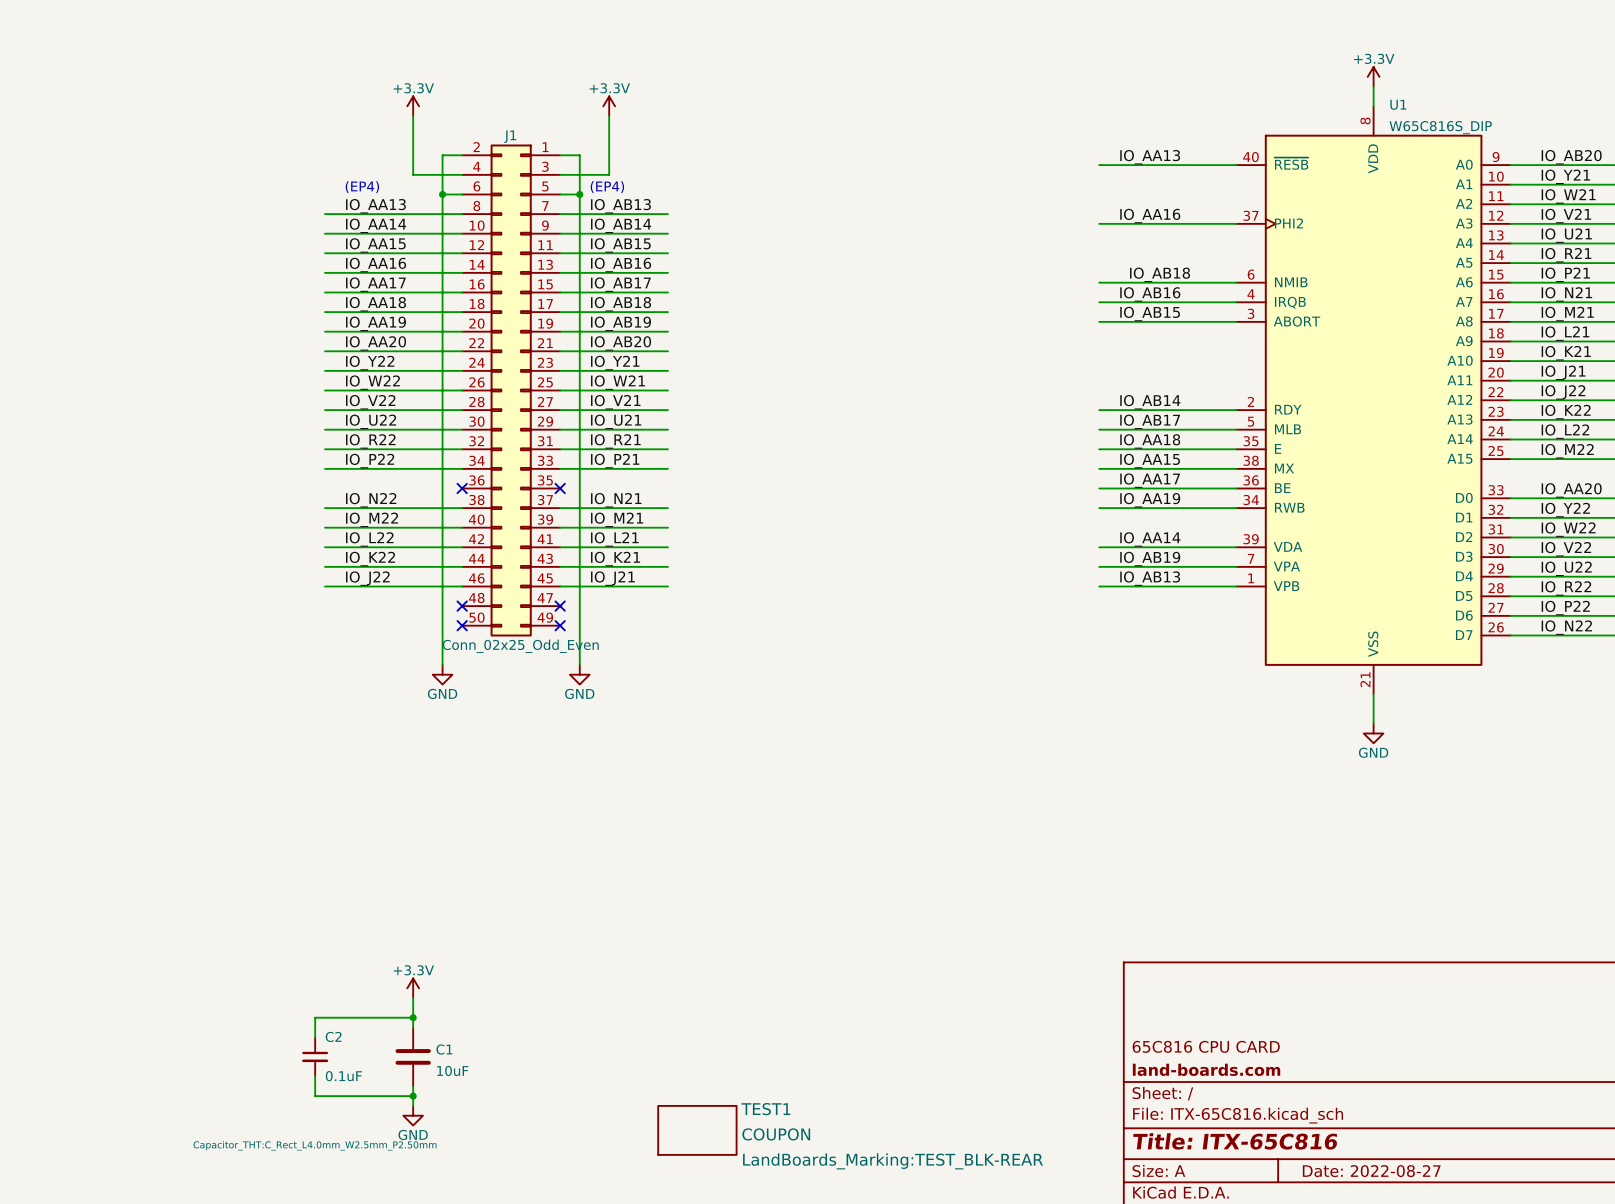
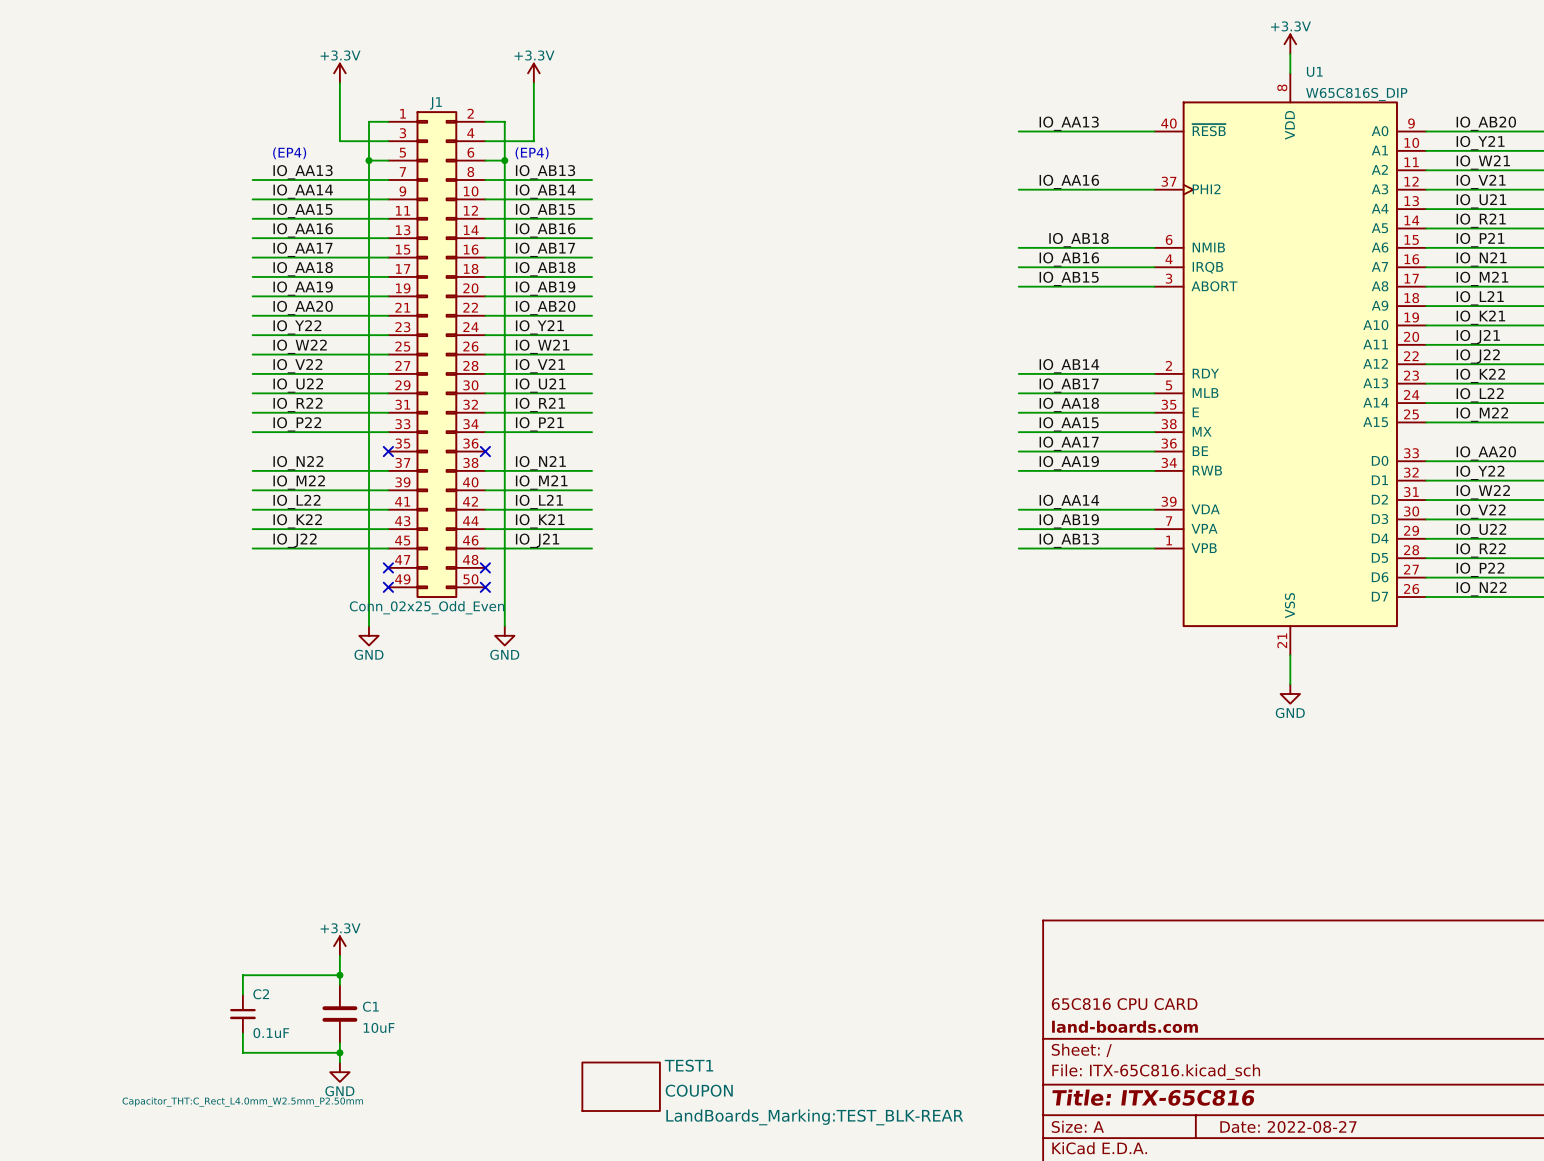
J1 flip: as is (511, 390) -> left-right (436, 354)

